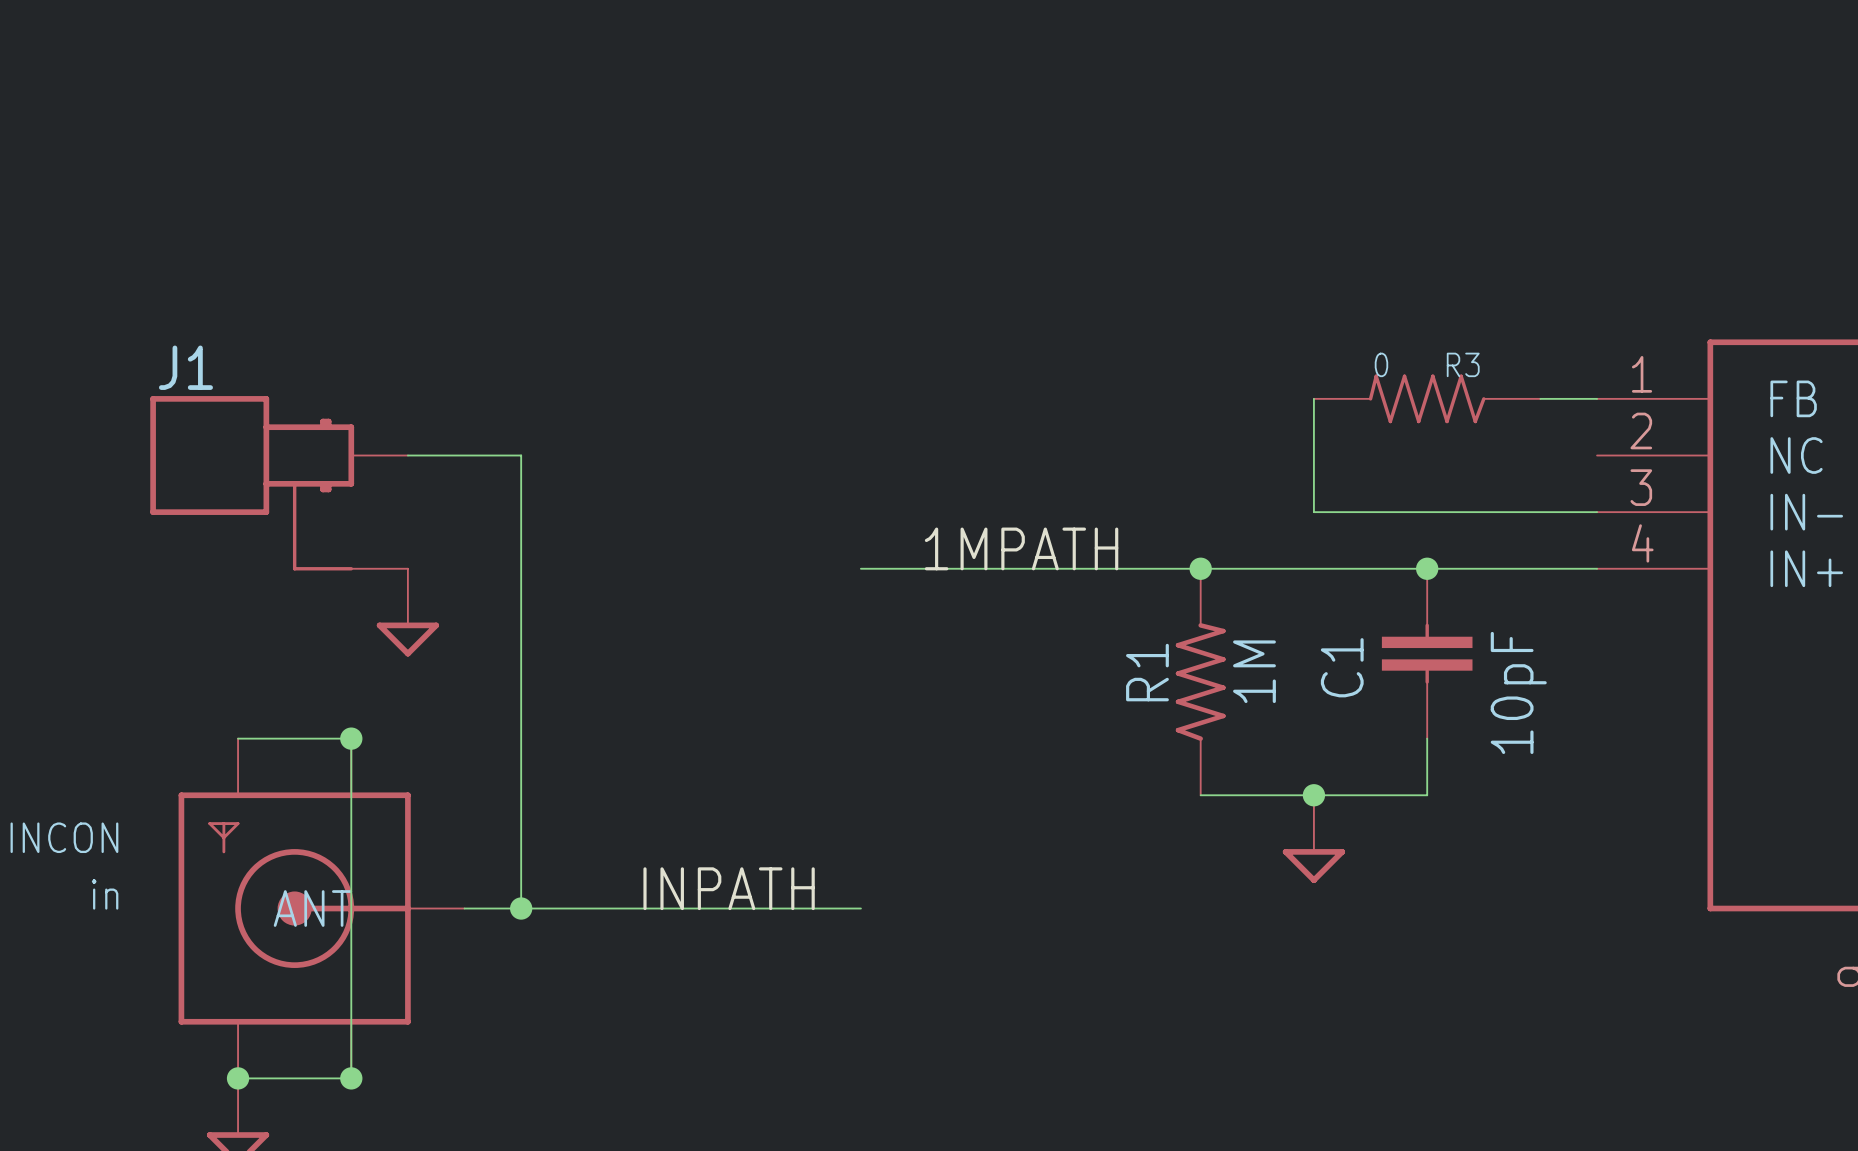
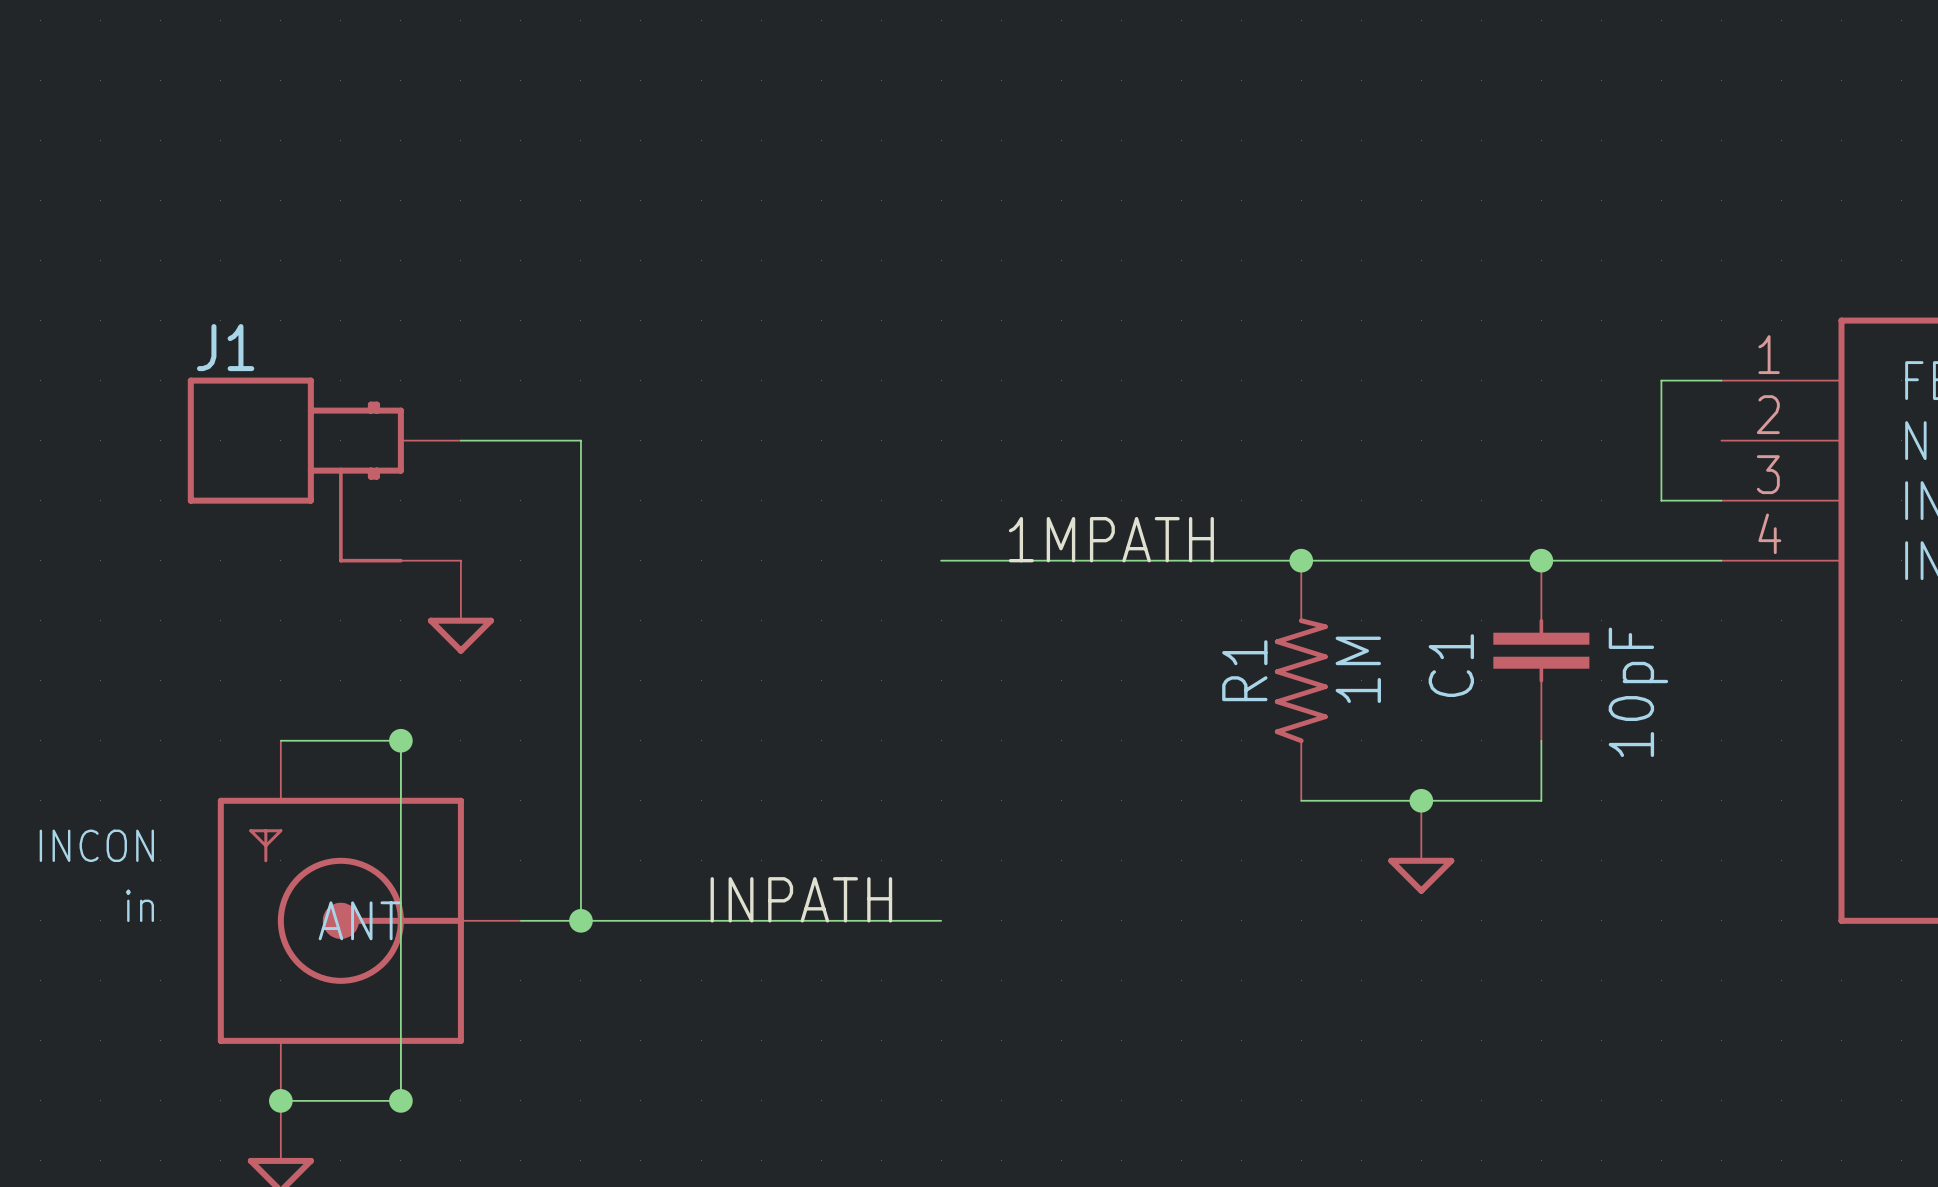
wire: (1313, 398) (1313, 512) (1540, 512) -> (1661, 380) (1661, 500)
R3: 0 (1427, 398) -> none

